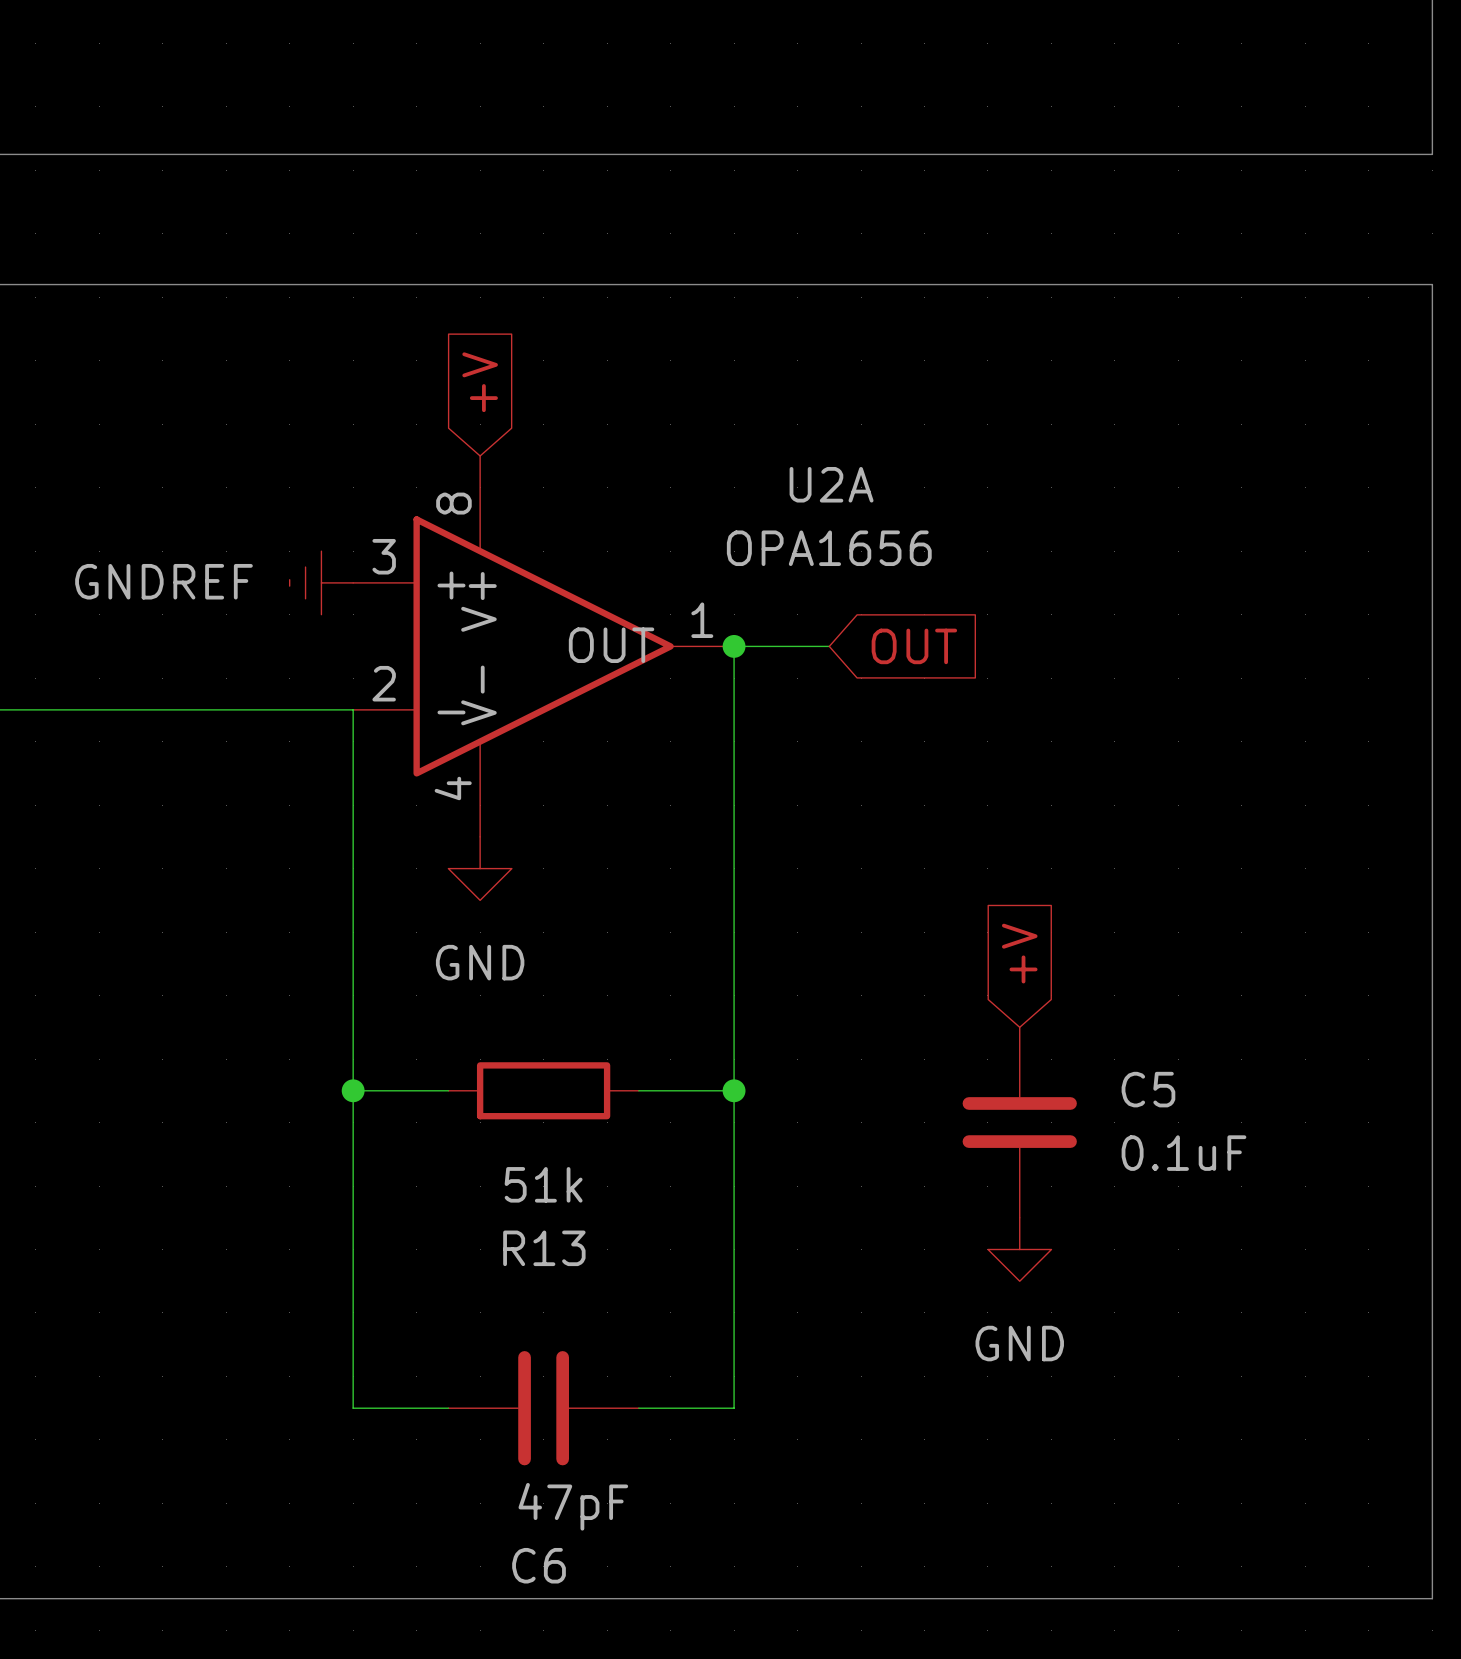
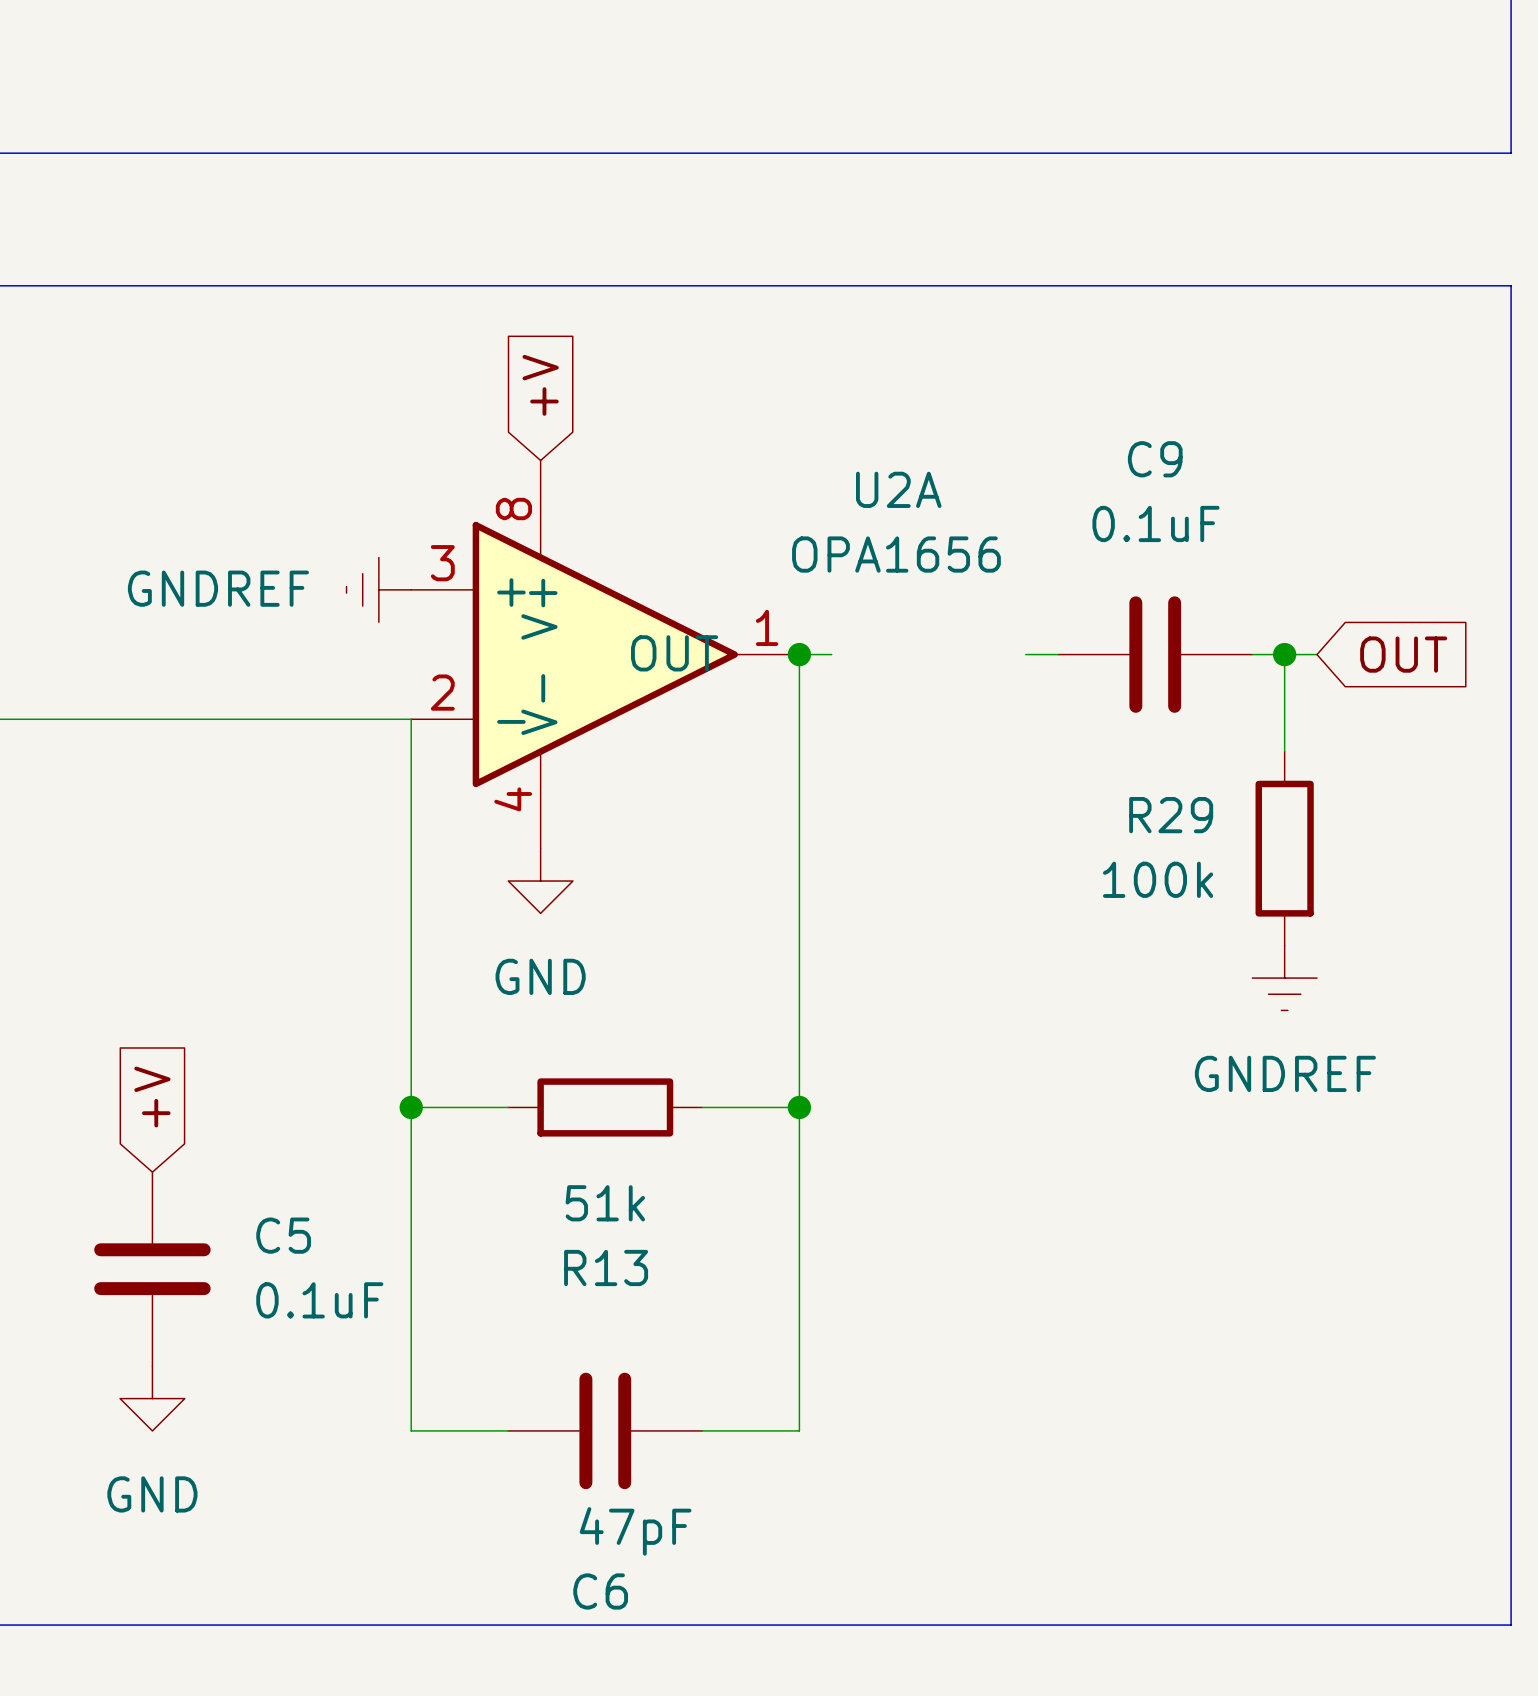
wire: (765, 646) (829, 646) -> (1252, 654) (1316, 654)
global label position: OUT (914, 646) -> OUT (1403, 654)
wire: none -> (1025, 654) (1058, 654)
C9: none -> 0.1uF (1155, 654)
wire: none -> (1284, 654) (1284, 751)
junction: none -> (1284, 654)
R29: none -> 100k (1284, 848)
global label: +V (1019, 953) -> none
power symbol: none -> GNDREF (1284, 978)
global label: none -> +V (152, 1097)
C5 position: (1019, 1122) -> (152, 1269)
power symbol: GND (1019, 1249) -> none
power symbol: none -> GND (152, 1398)

